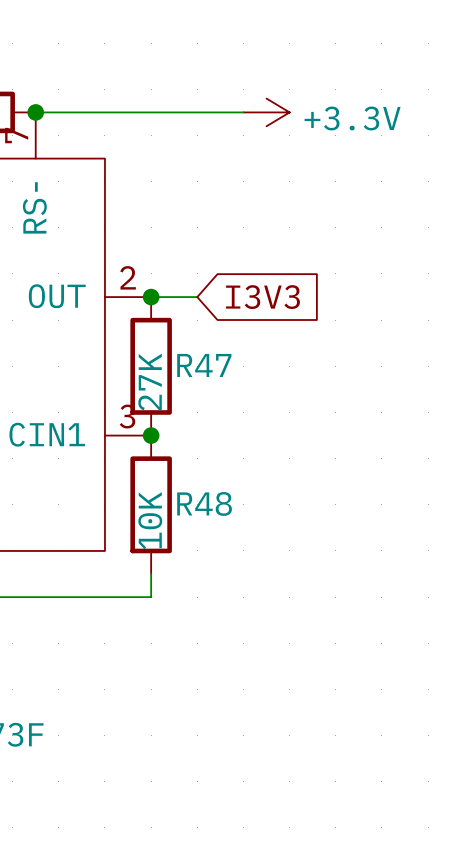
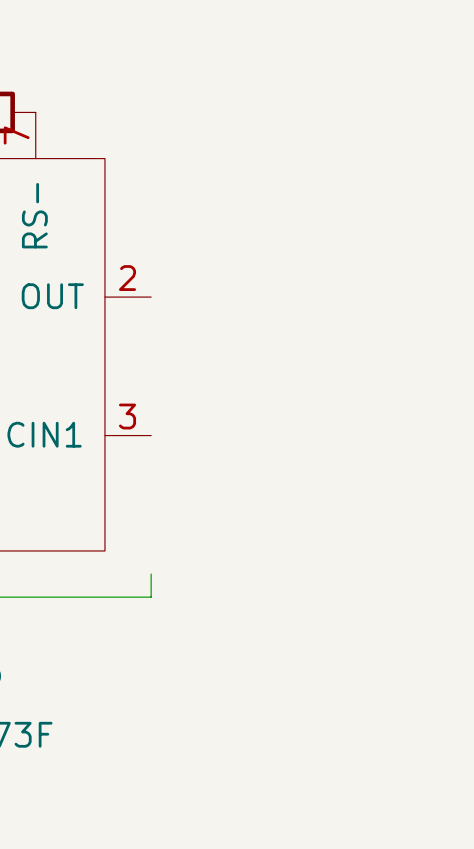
wire: (35, 112) (243, 112) -> none
junction: (35, 112) -> none
power symbol: +3.3V (266, 112) -> none
wire: (151, 297) (197, 297) -> none
junction: (151, 297) -> none
global label: I3V3 (262, 297) -> none
R47: 27K (151, 366) -> none
junction: (151, 435) -> none
R48: 10K (151, 504) -> none

